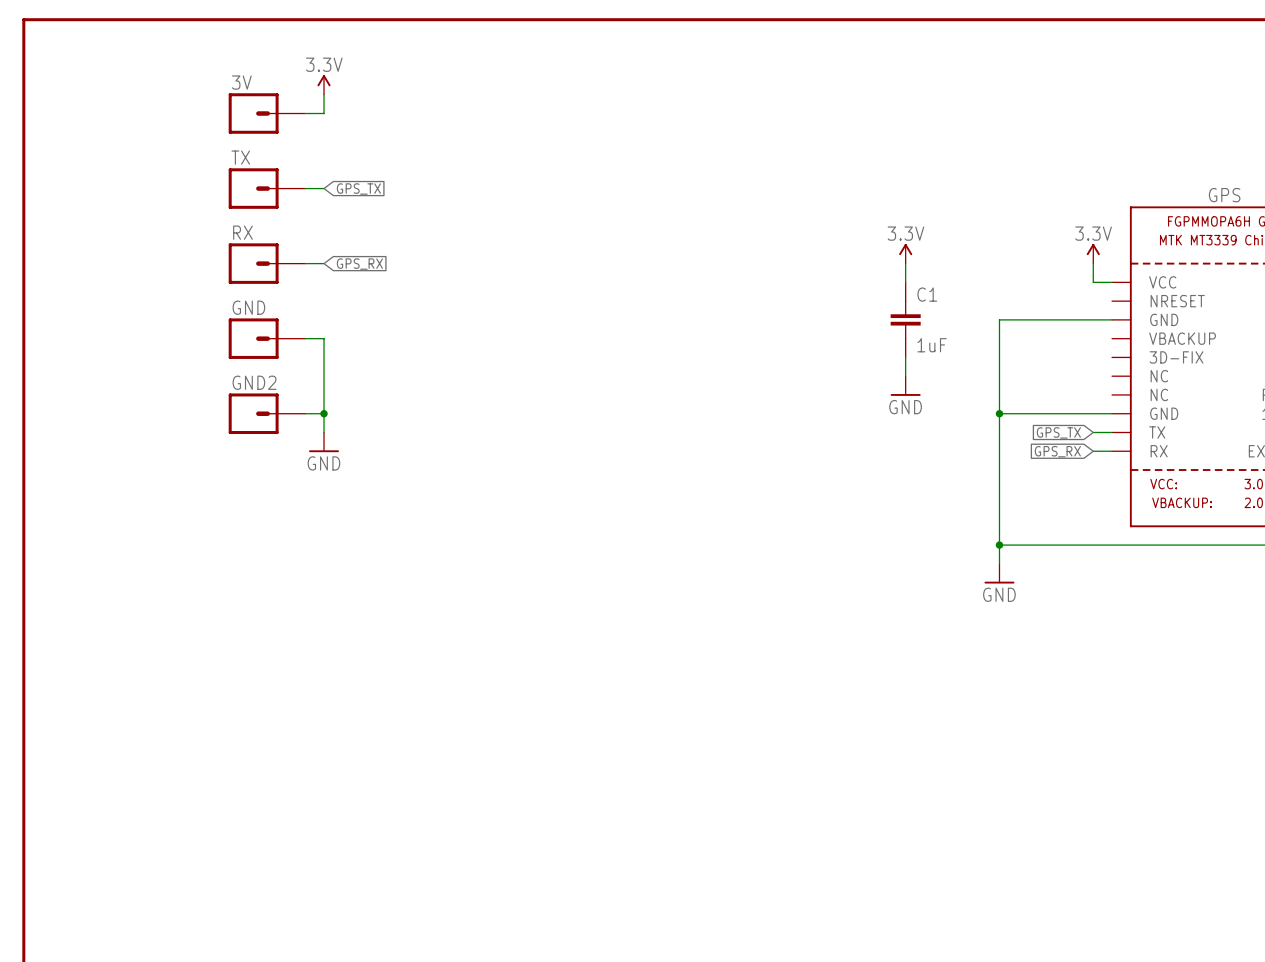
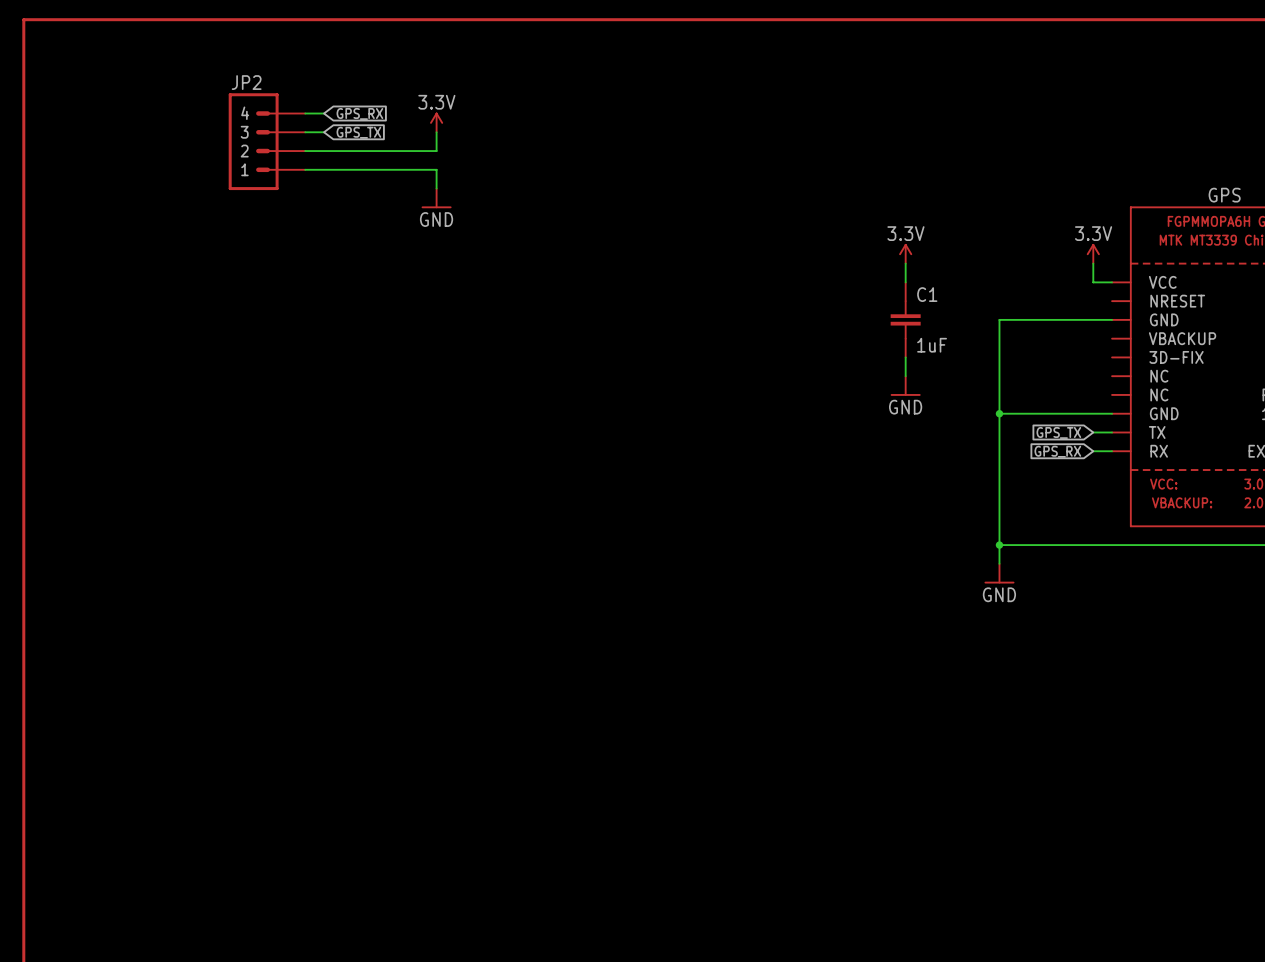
power symbol position: 3.3V (324, 84) -> 3.3V (436, 122)
wire: (324, 94) (324, 113) -> none
3V: (266, 113) -> none
wire: none -> (436, 132) (436, 151) (305, 151)
JP2: none -> (266, 141)
wire: none -> (305, 169) (436, 169) (436, 188)
TX: (266, 188) -> none
wire: (305, 188) (324, 188) -> (305, 132) (324, 132)
global label position: GPS_TX (358, 189) -> GPS_TX (358, 132)
power symbol: none -> GND (436, 198)
RX: (266, 263) -> none
wire: (305, 263) (324, 263) -> none
global label position: GPS_RX (359, 264) -> GPS_RX (359, 113)
GND: (266, 338) -> none
wire: (305, 338) (324, 338) (324, 432) -> none
GND2: (266, 413) -> none
wire: (305, 413) (324, 413) -> none
junction: (324, 413) -> none
power symbol: GND (324, 442) -> none

